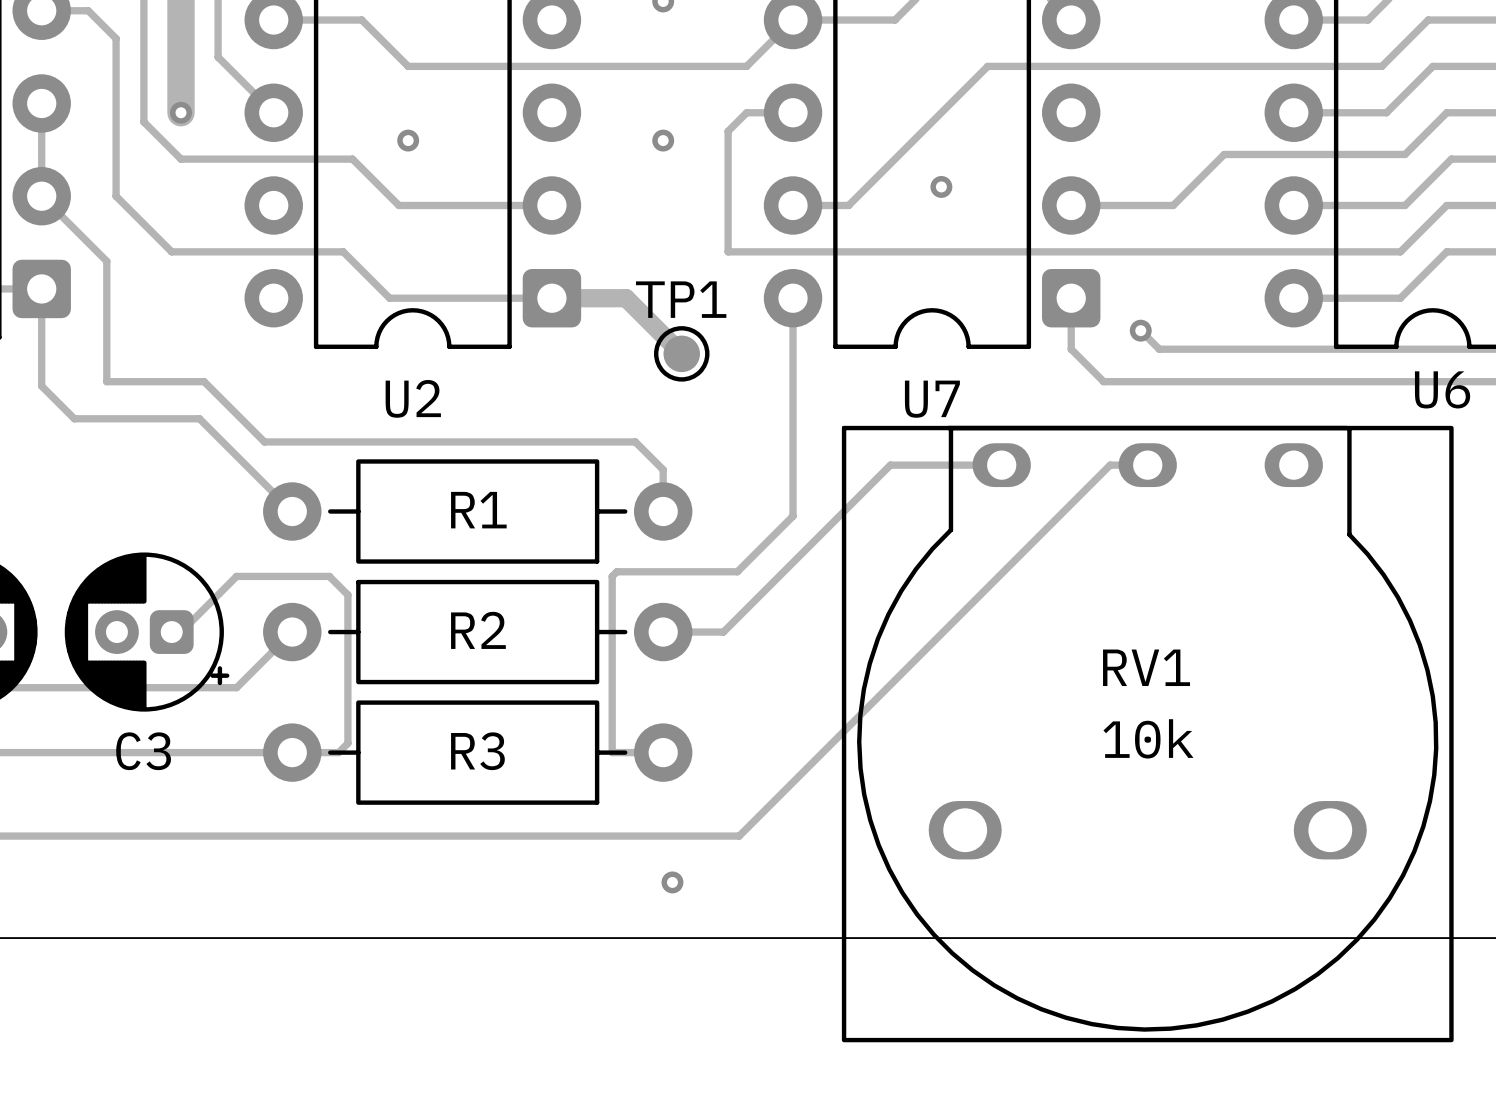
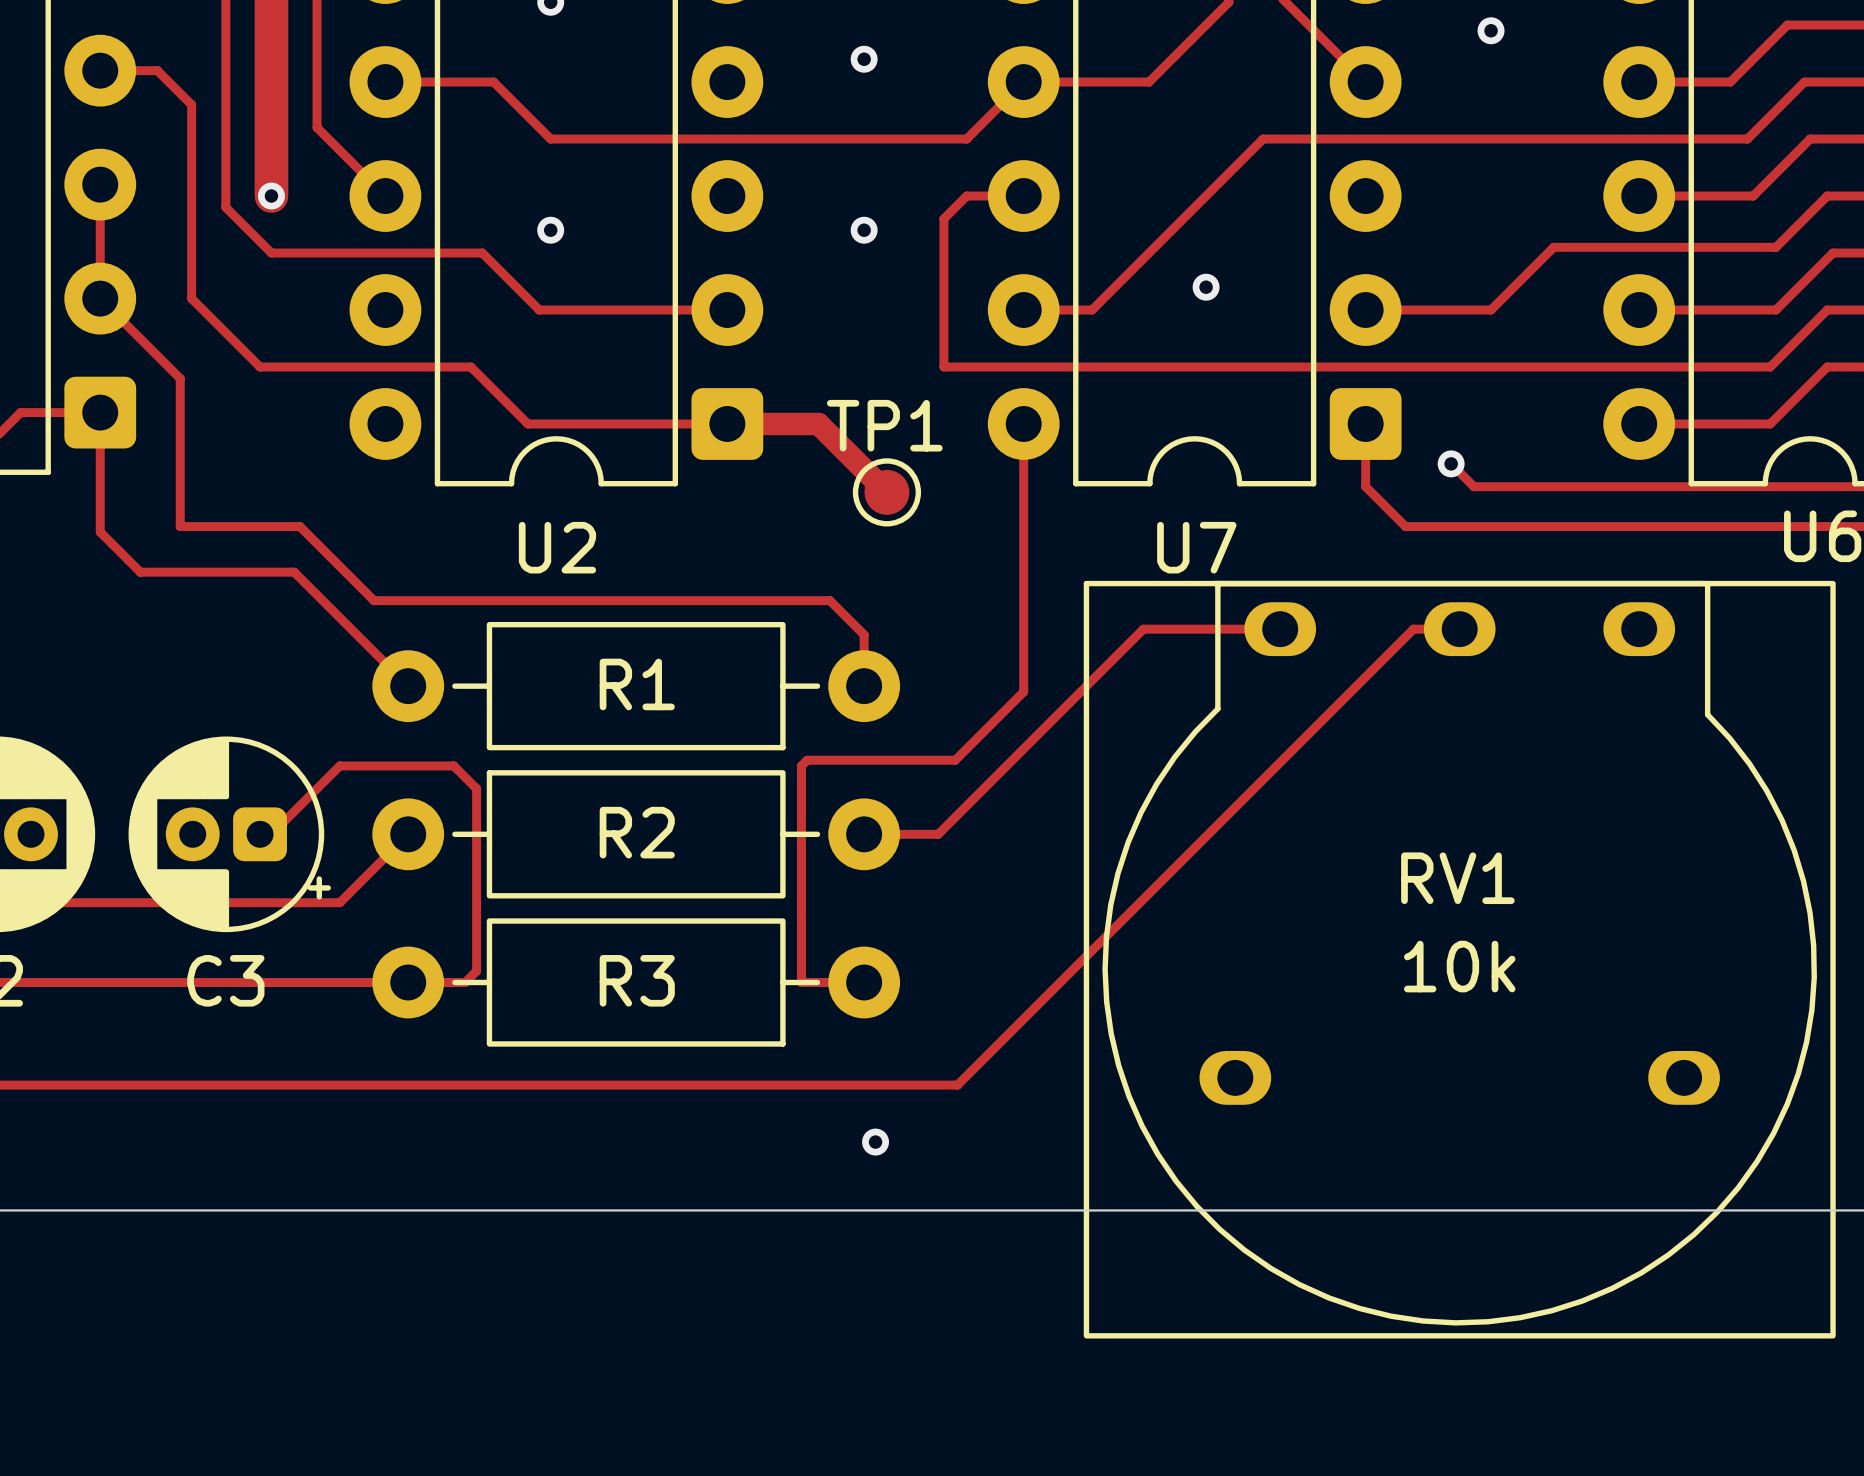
RV1 footprint: [841, 425, 1454, 1043] -> [1083, 580, 1836, 1339]

